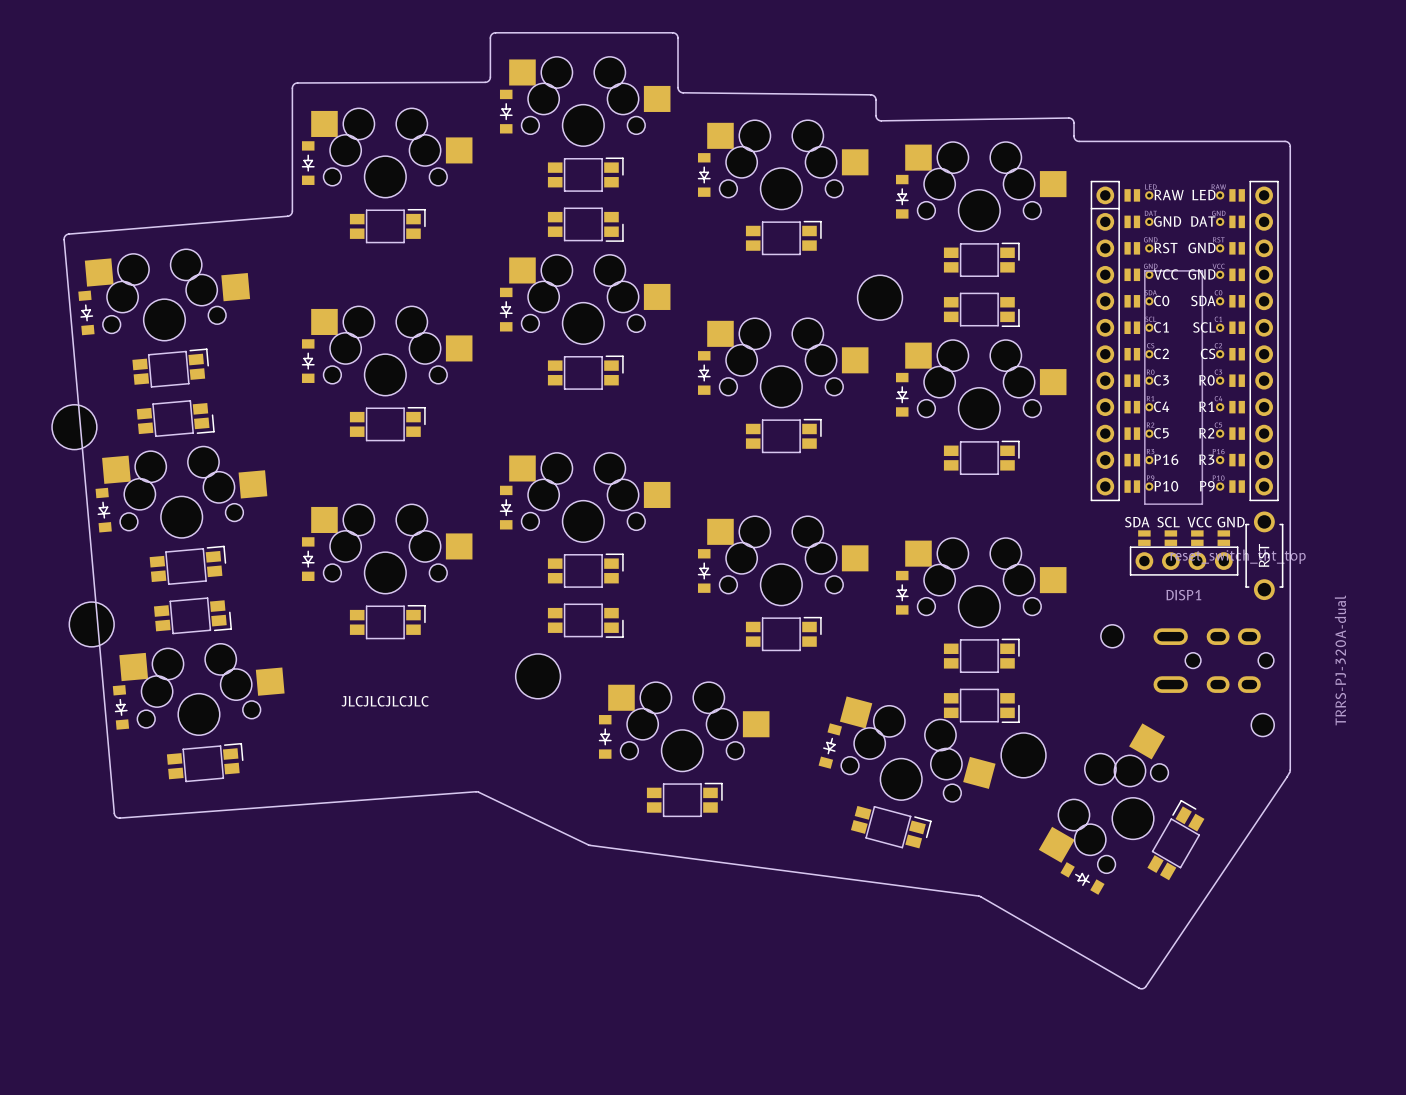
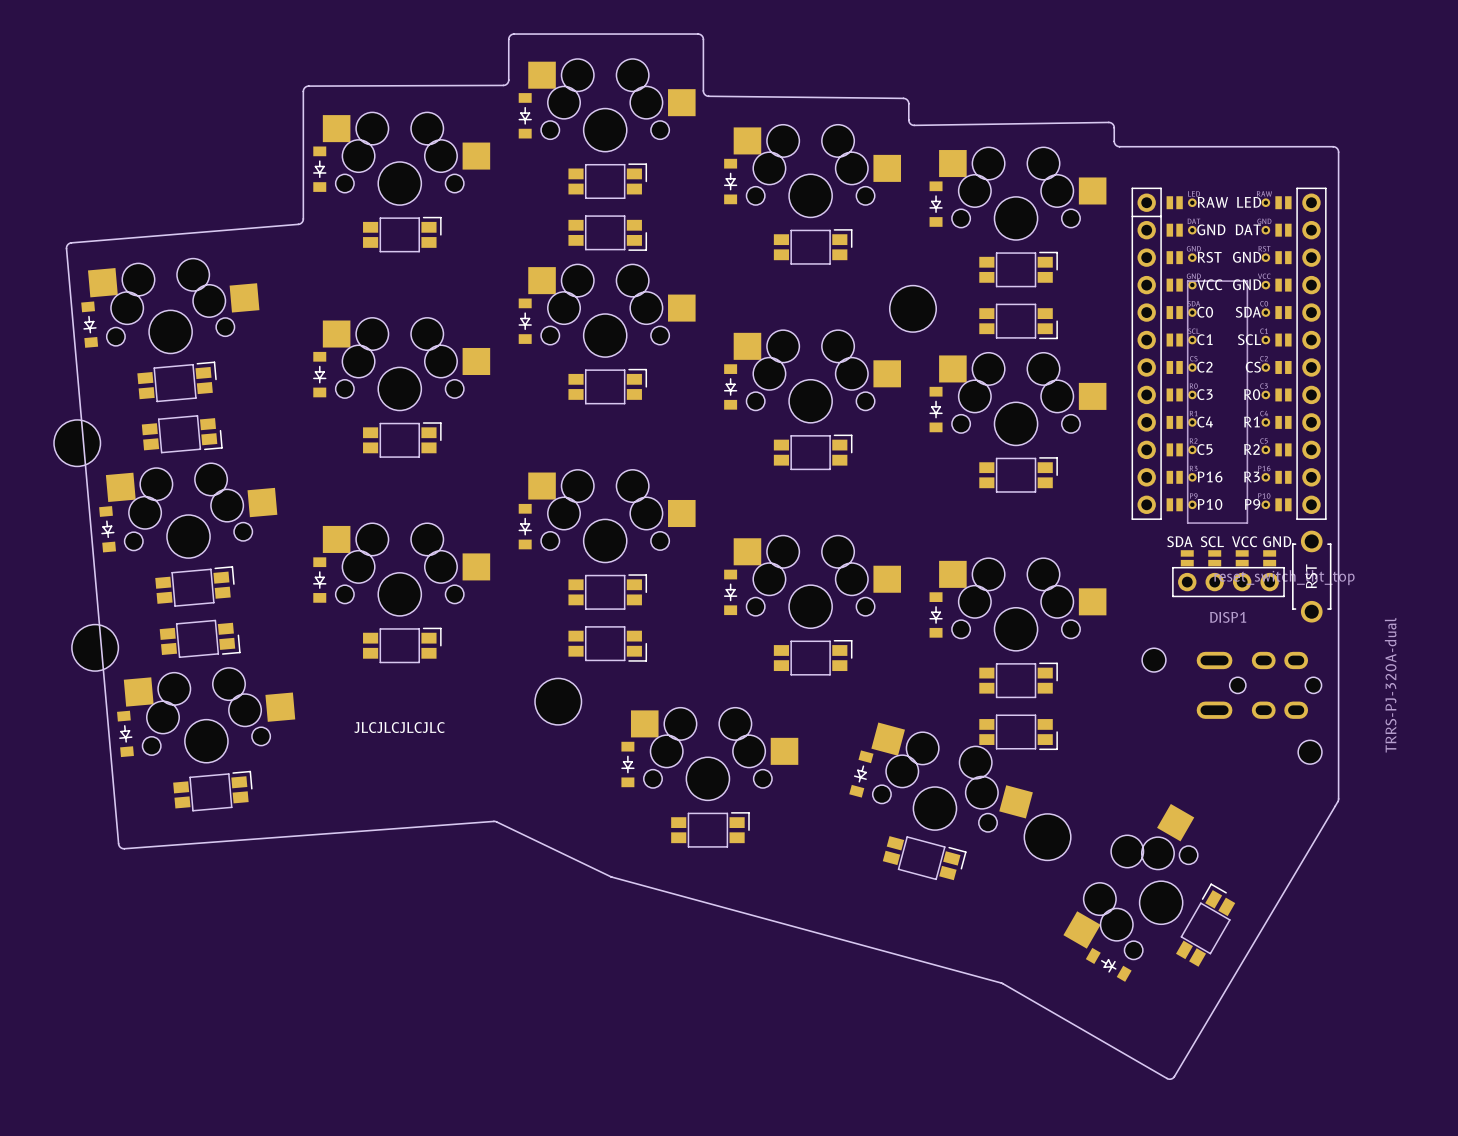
part position: (1023, 755) -> (1047, 837)
board edge: (1286, 777) (1145, 986) (1142, 988) (979, 896) (588, 844) -> (1335, 806) (1174, 1076) (1170, 1079) (1002, 983) (610, 876)
part position: (1103, 798) -> (1130, 881)
part position: (1175, 840) -> (1205, 925)
part position: (1082, 878) -> (1108, 964)

